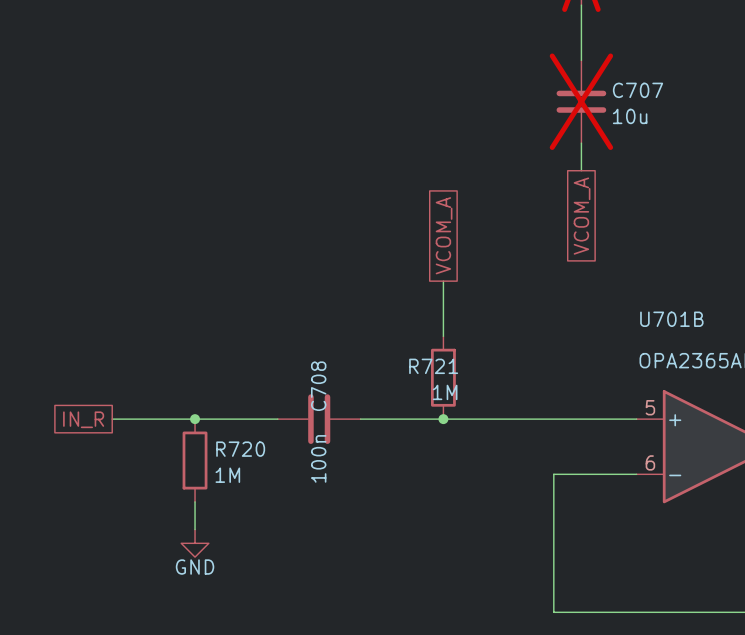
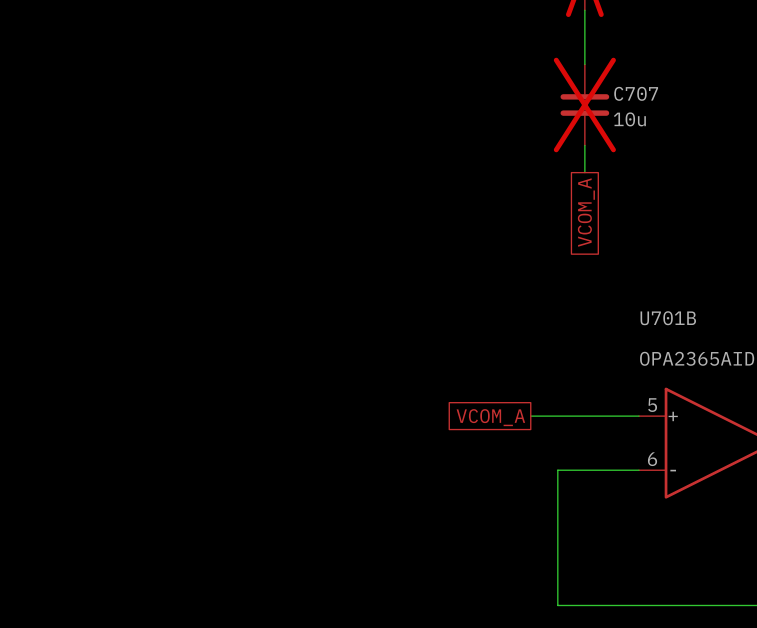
global label rotation: 0° (444, 235) -> 90° counterclockwise (490, 417)
global label position: VCOM_A (444, 235) -> VCOM_A (490, 417)
wire: (443, 281) (443, 336) -> none
R721: 1M (443, 377) -> none
global label: IN_R (83, 419) -> none
wire: (112, 419) (277, 419) -> none
junction: (195, 419) -> none
C708: 100n (319, 419) -> none
wire: (360, 419) (526, 419) -> none
junction: (443, 419) -> none
R720: 1M (195, 460) -> none
wire: (195, 501) (195, 529) -> none
power symbol: GND (195, 543) -> none

